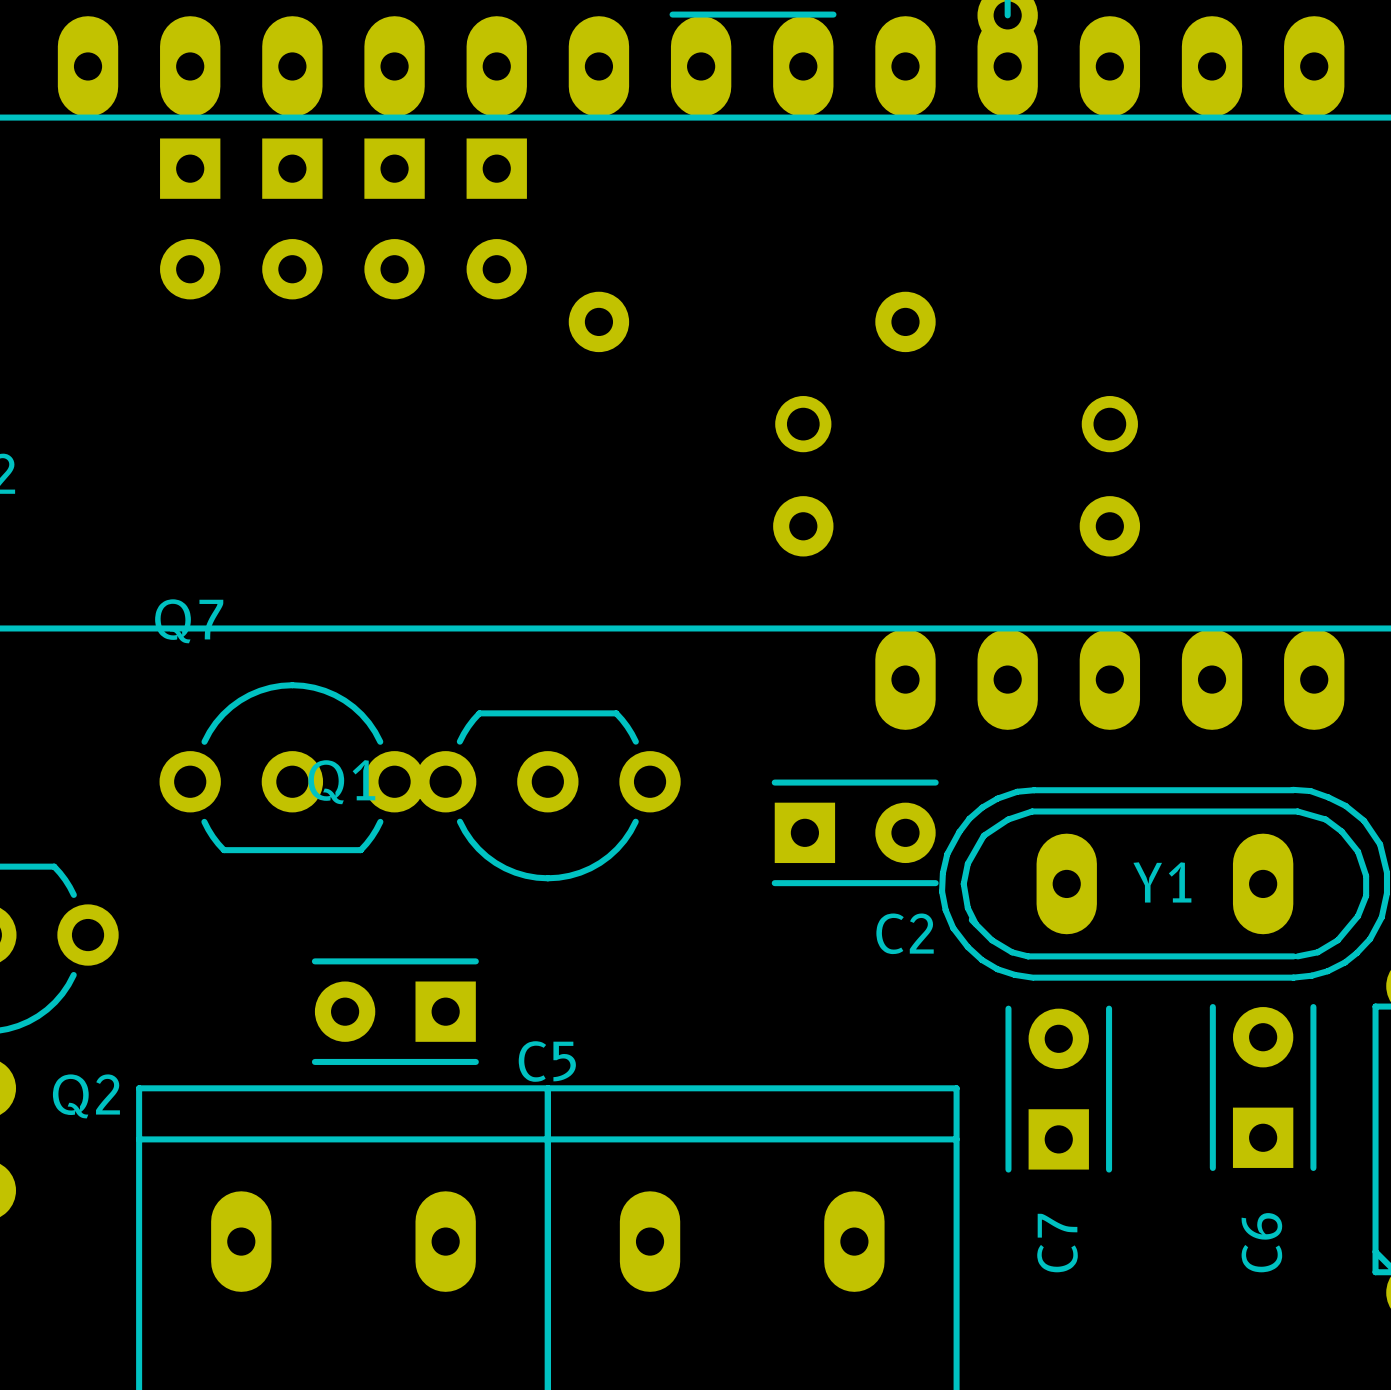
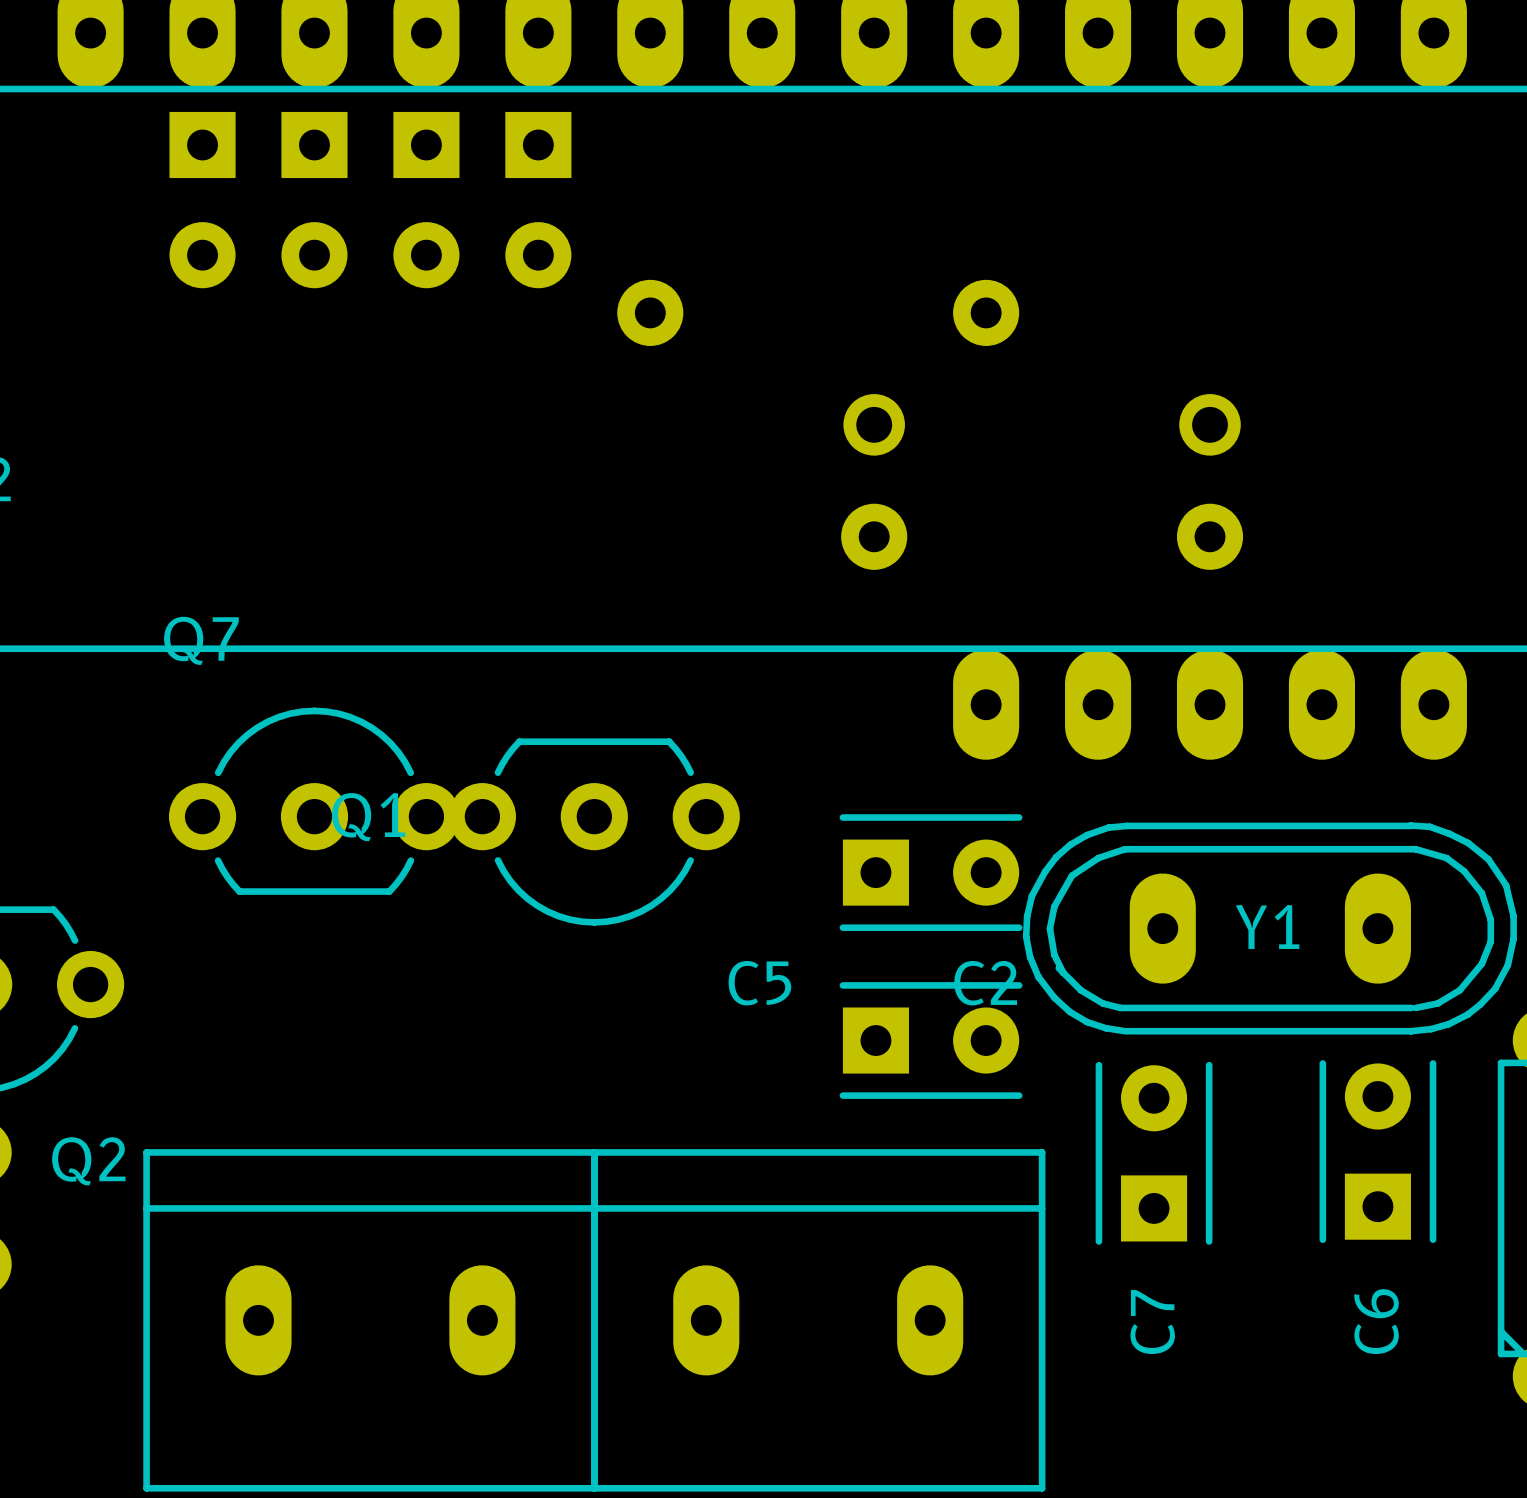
C5 rotation: 0° (395, 1011) -> 180° (931, 1040)
C5 position: (395, 1011) -> (931, 1040)

